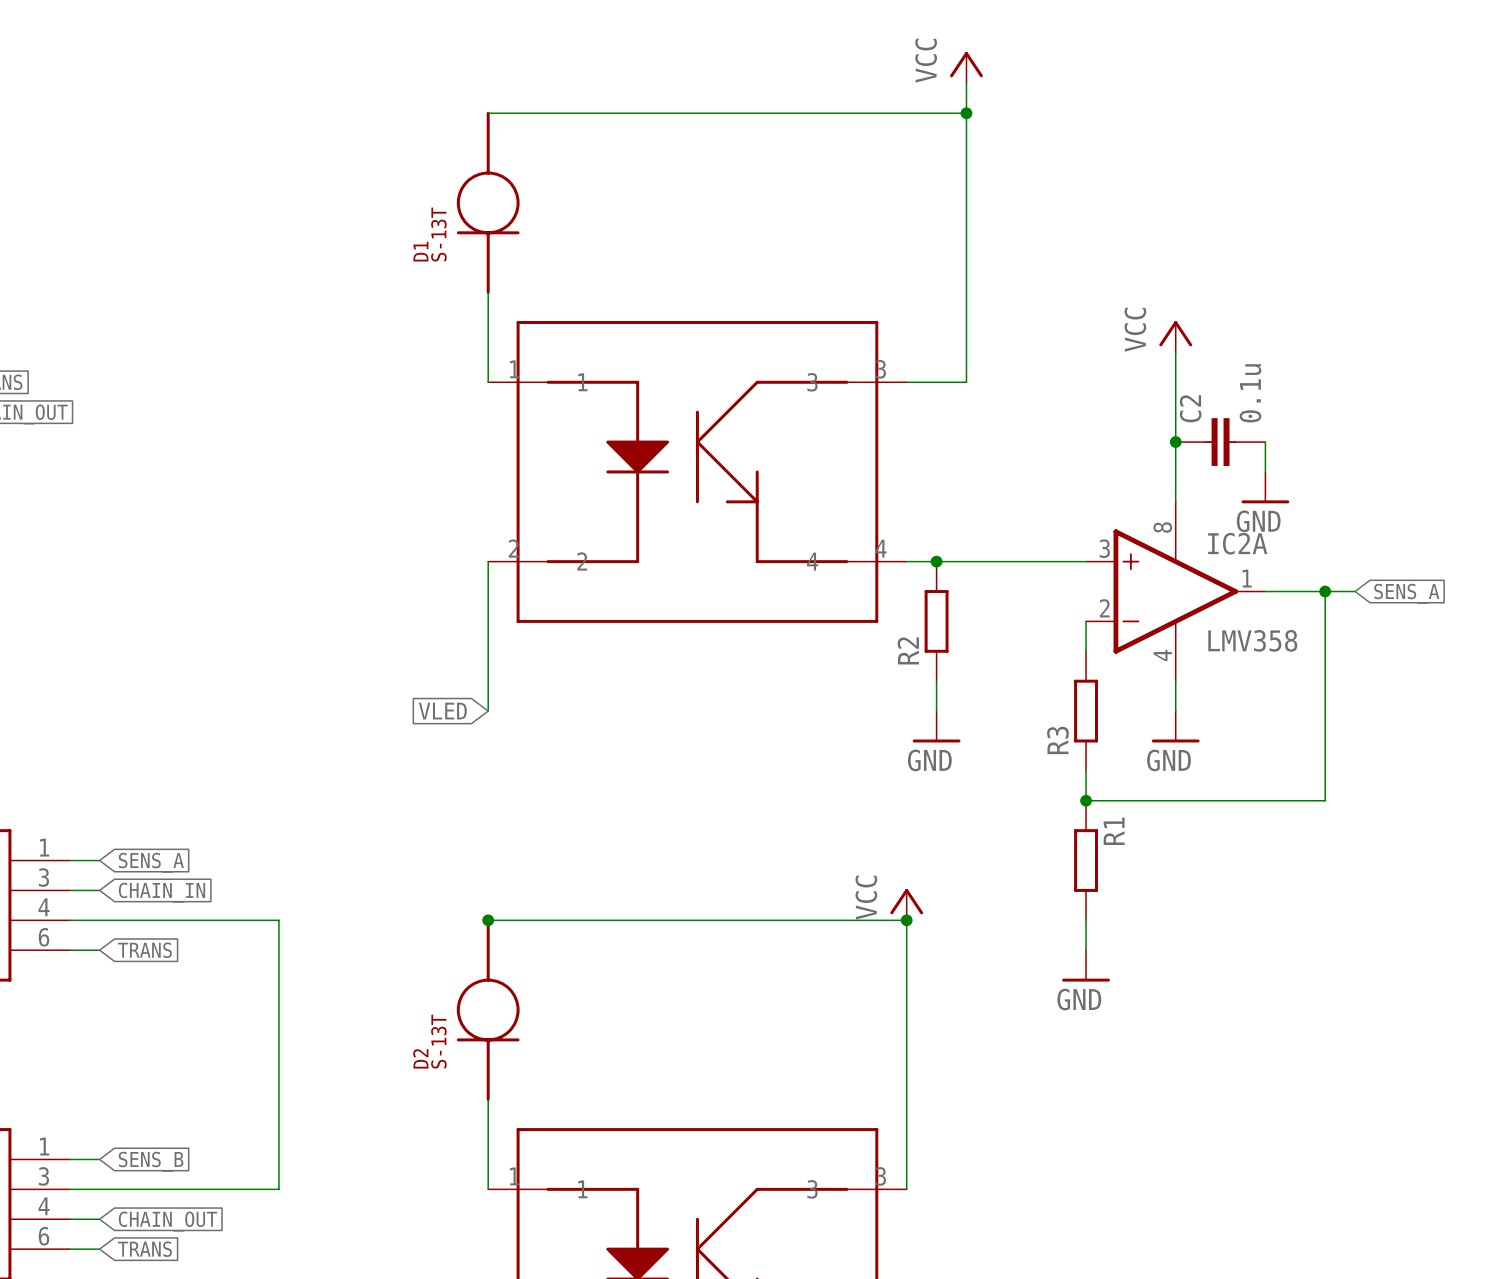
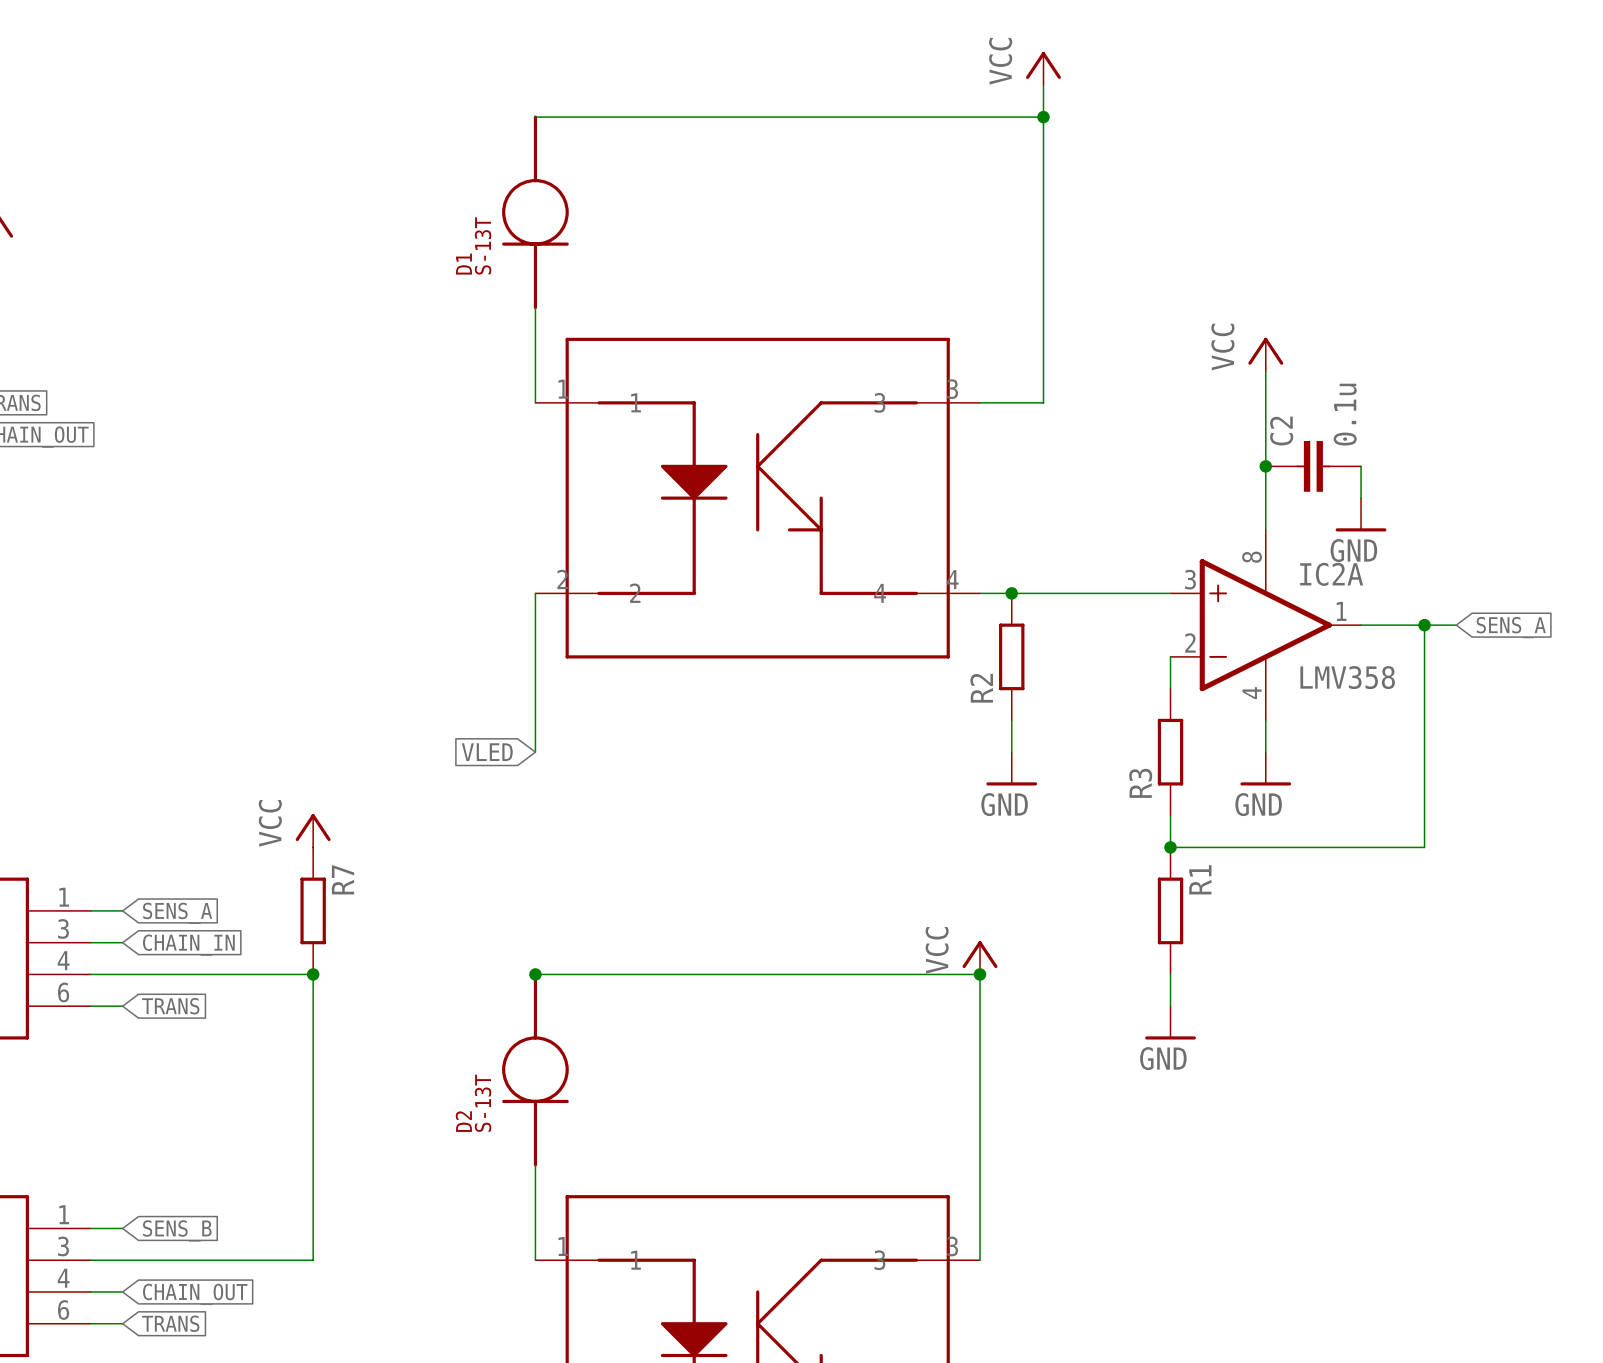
power symbol: none -> VCC (313, 830)
R7: none -> (313, 910)
junction: none -> (313, 974)

